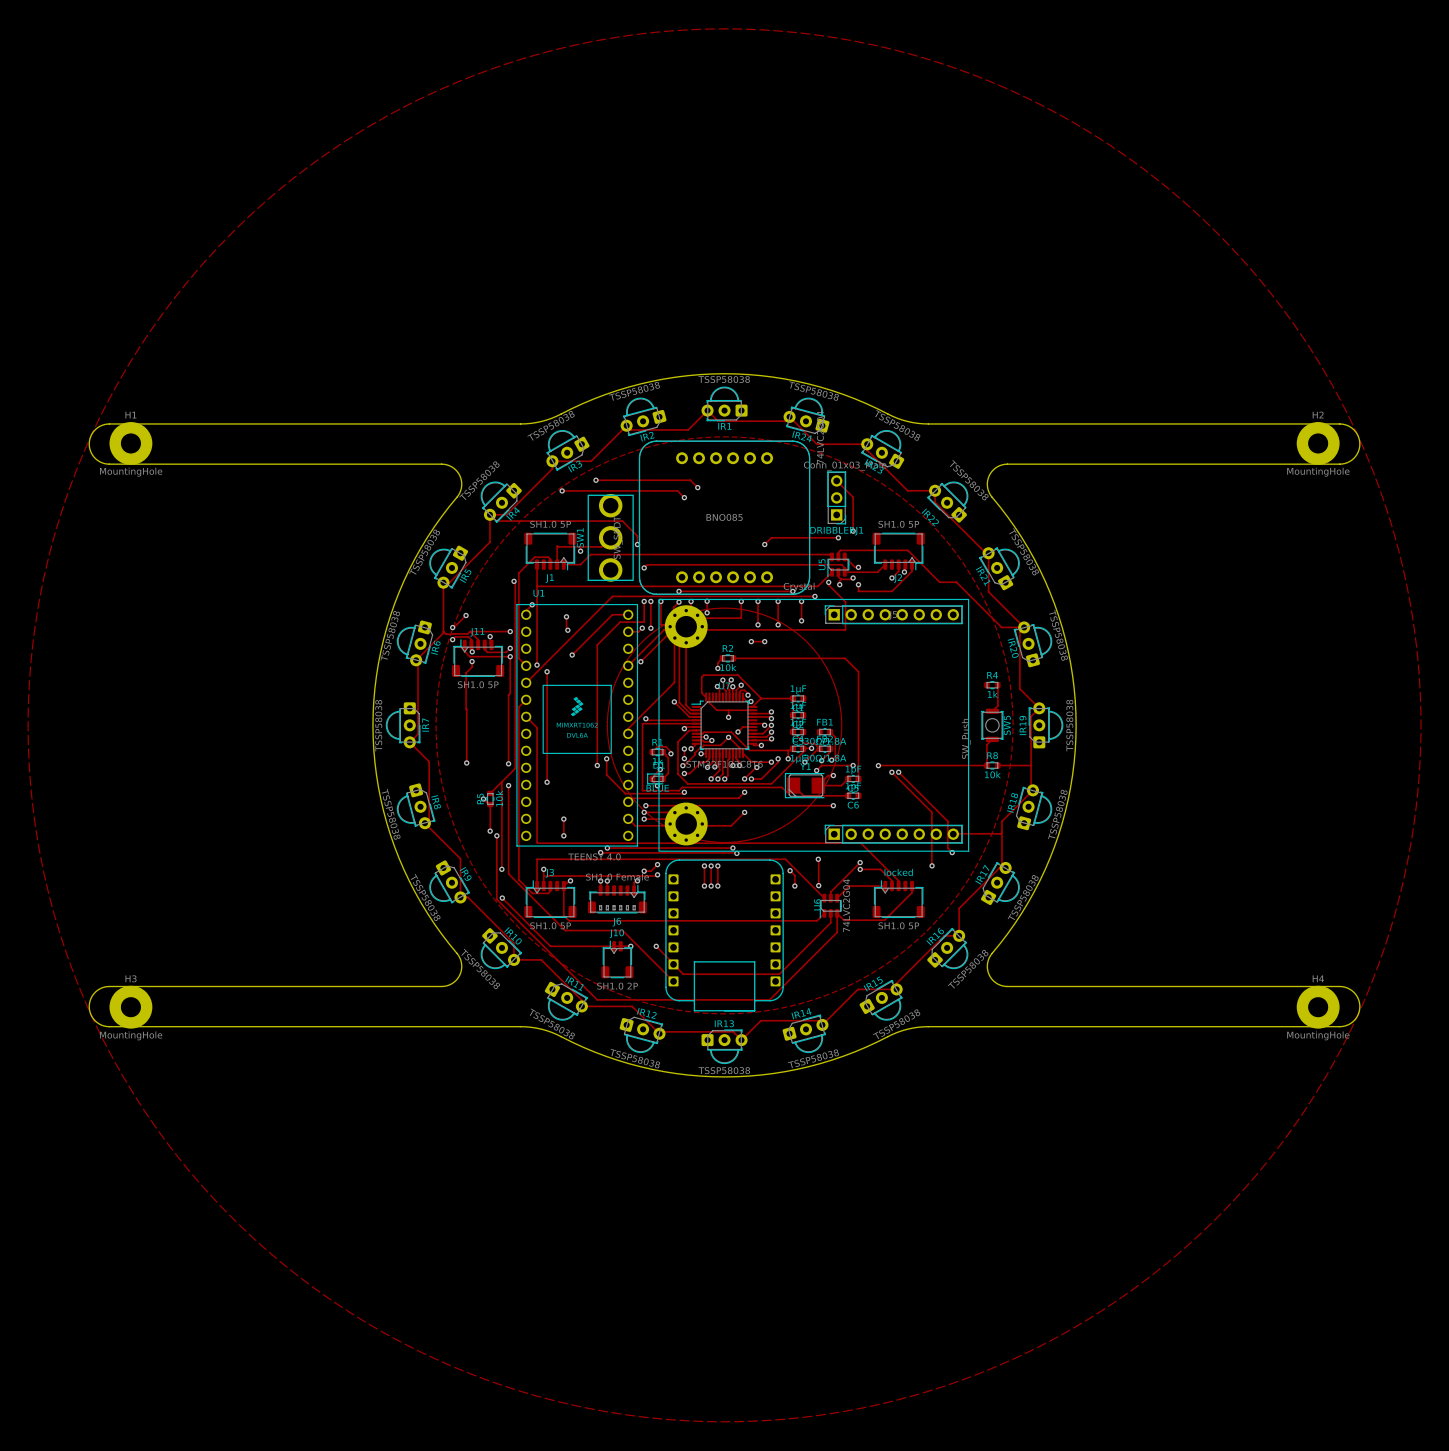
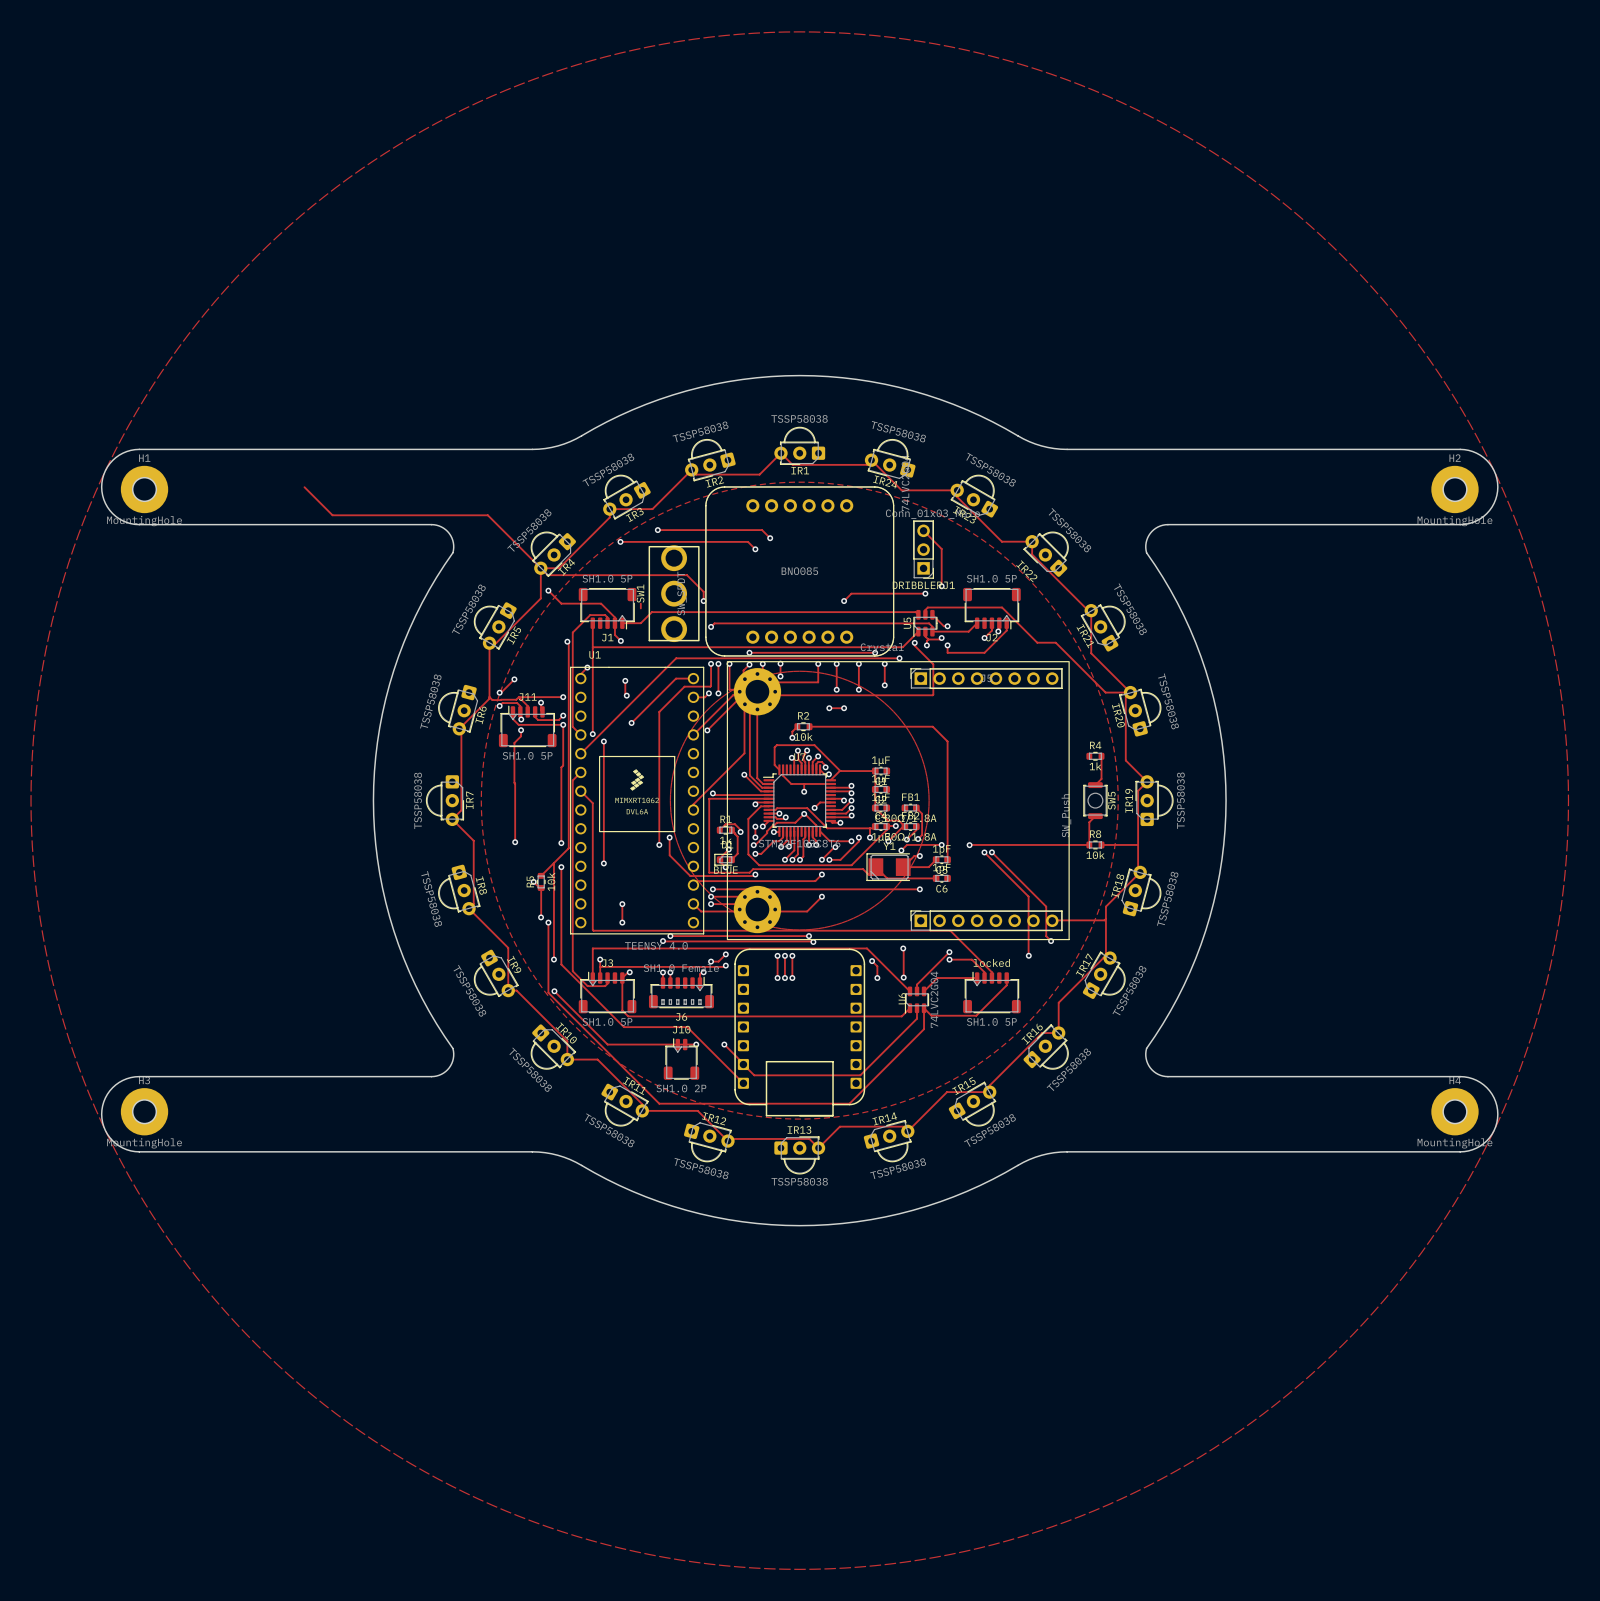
board edge: (561, 414) (605, 394) (652, 381) (688, 375) (736, 373) (772, 377) (820, 387) (854, 398) (897, 418) (923, 423) (1339, 423) (1351, 428) (1359, 438) (1359, 449) (1353, 458) (1342, 463) (1007, 464) (997, 466) (990, 473) (987, 483) (989, 493) (1028, 547) (1045, 580) (1058, 615) (1072, 675) (1076, 725) (1070, 787) (1054, 846) (1034, 892) (1014, 923) (990, 955) (987, 967) (993, 980) (1007, 986) (1342, 986) (1351, 990) (1358, 998) (1359, 1009) (1355, 1018) (1347, 1025) (1339, 1026) (917, 1027) (897, 1032) (854, 1051) (808, 1066) (760, 1075) (724, 1076) (676, 1073) (640, 1066) (594, 1051) (551, 1032) (525, 1026) (109, 1026) (97, 1023) (90, 1013) (89, 1001) (96, 991) (106, 986) (441, 986) (451, 983) (458, 977) (461, 967) (459, 957) (421, 902) (404, 869) (390, 835) (378, 787) (372, 725) (378, 663) (394, 603) (415, 558) (434, 526) (458, 495) (461, 483) (455, 469) (441, 464) (106, 464) (97, 460) (91, 453) (89, 441) (92, 432) (99, 426) (109, 423) (525, 423) (546, 420) (561, 414) -> (581, 435) (557, 445) (532, 449) (135, 449) (119, 455) (107, 467) (101, 482) (103, 499) (115, 516) (130, 523) (434, 524) (441, 526) (449, 533) (453, 547) (452, 552) (436, 577) (415, 615) (393, 670) (385, 698) (377, 742) (373, 800) (377, 859) (389, 916) (403, 958) (415, 985) (429, 1011) (452, 1048) (453, 1058) (450, 1065) (441, 1074) (431, 1076) (130, 1077) (112, 1087) (102, 1105) (103, 1126) (115, 1143) (126, 1149) (139, 1151) (545, 1152) (570, 1159) (632, 1191) (686, 1210) (742, 1221) (799, 1225) (856, 1221) (912, 1210) (966, 1191) (1029, 1159) (1054, 1152) (1460, 1151) (1476, 1148) (1489, 1137) (1497, 1118) (1495, 1101) (1483, 1084) (1468, 1077) (1165, 1076) (1151, 1069) (1146, 1061) (1145, 1053) (1146, 1048) (1170, 1011) (1183, 985) (1205, 930) (1213, 902) (1222, 859) (1226, 800) (1222, 742) (1209, 684) (1200, 656) (1183, 615) (1170, 589) (1146, 552) (1146, 542) (1148, 535) (1158, 526) (1167, 524) (1468, 523) (1486, 513) (1496, 495) (1495, 474) (1483, 457) (1472, 451) (1460, 449) (1054, 448) (1029, 441) (979, 415) (926, 394) (870, 381) (814, 375) (742, 379) (686, 390) (632, 409) (581, 435)
track: none -> (304, 487) (332, 515) (487, 515) (540, 568)
via: none -> (548, 590)
track: (610, 537) (601, 546) (557, 546) (557, 559) -> (548, 590) (561, 603) (601, 603) (614, 617)
via position: (580, 551) -> (620, 640)
track: none -> (614, 623) (614, 635) (620, 640)

